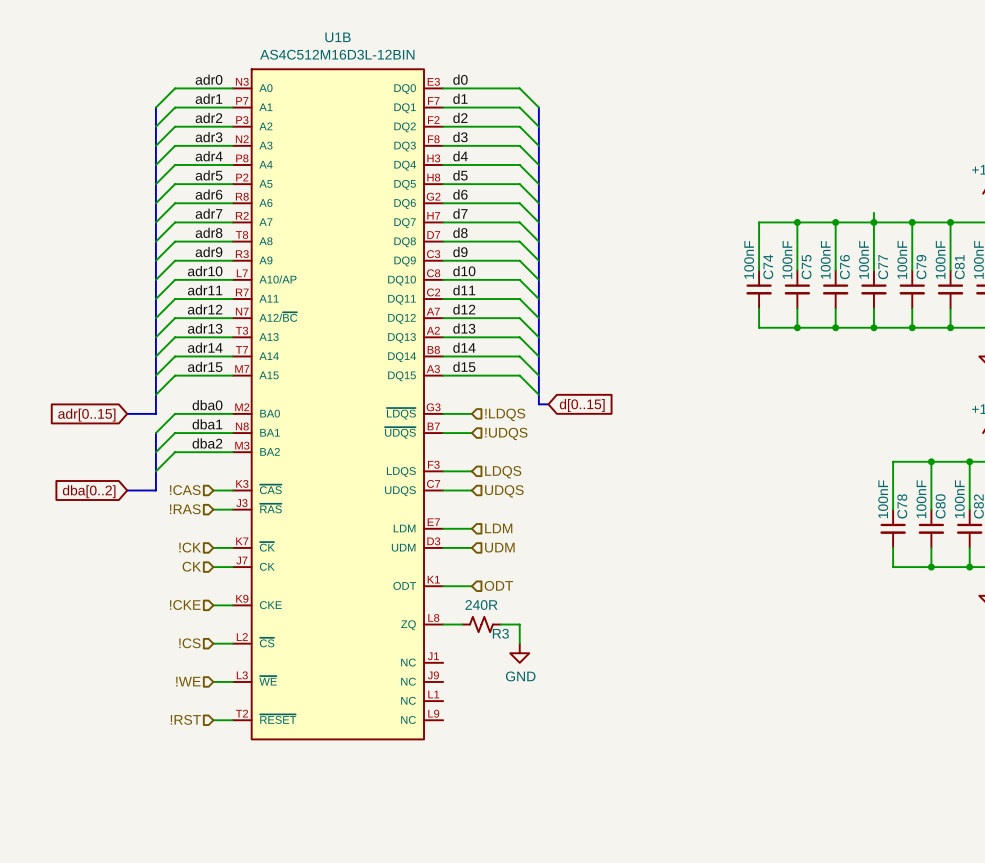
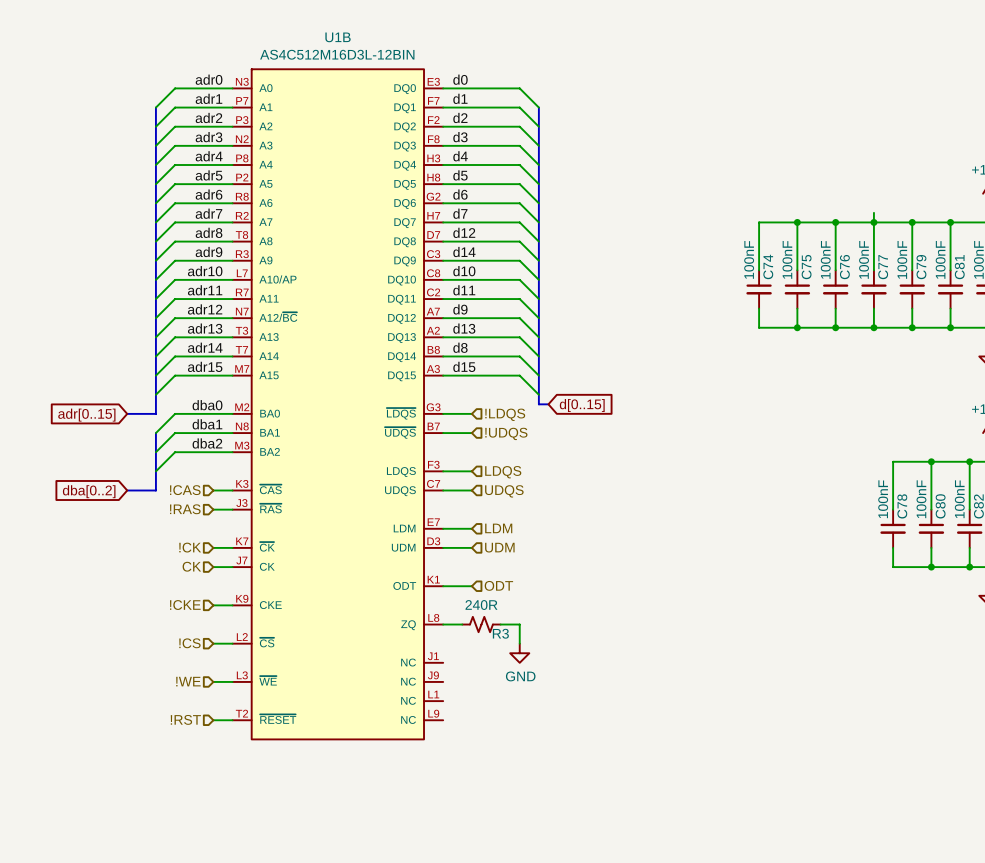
label: d8 (460, 232) -> d12 (464, 232)
label: d9 (460, 252) -> d14 (464, 252)
label: d12 (464, 309) -> d9 (460, 309)
label: d14 (464, 347) -> d8 (460, 347)

